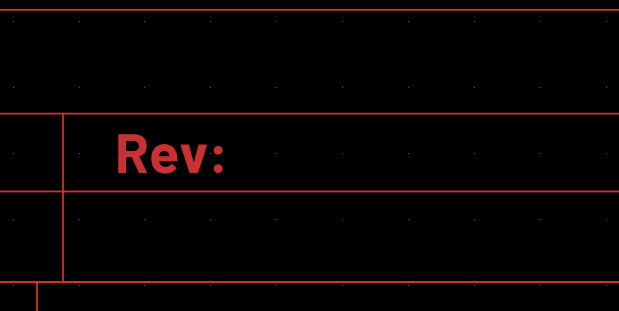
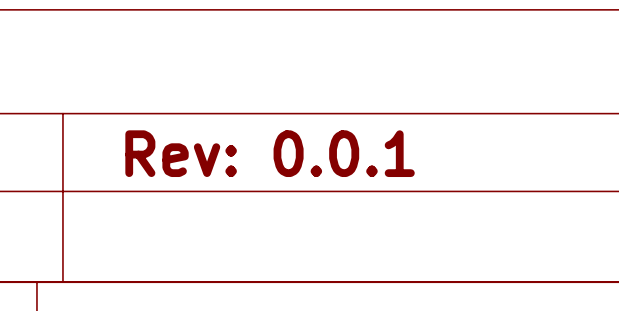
title block: Rev: (170, 153) -> Rev: 0.0.1 (270, 153)

